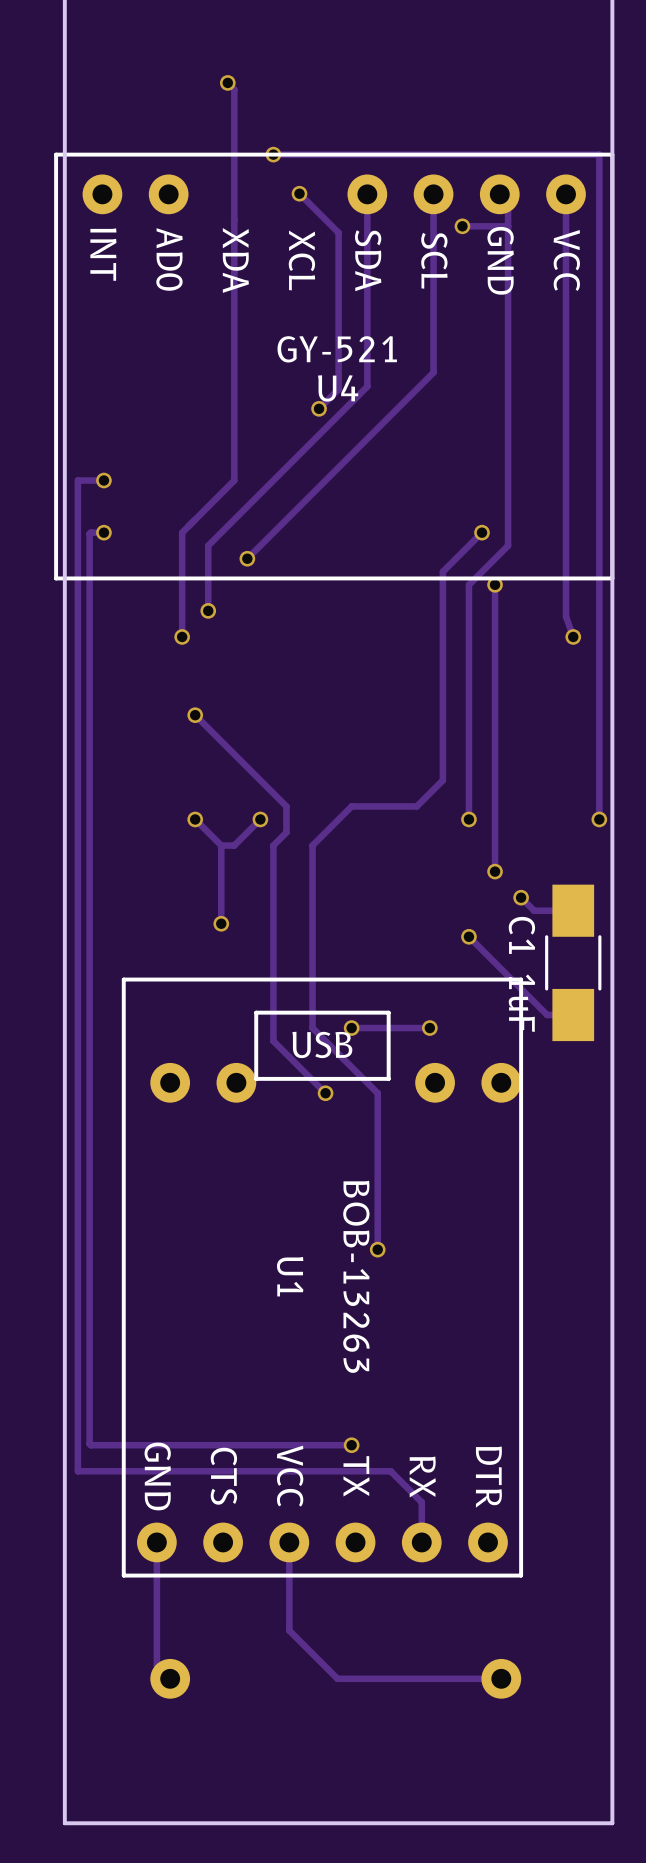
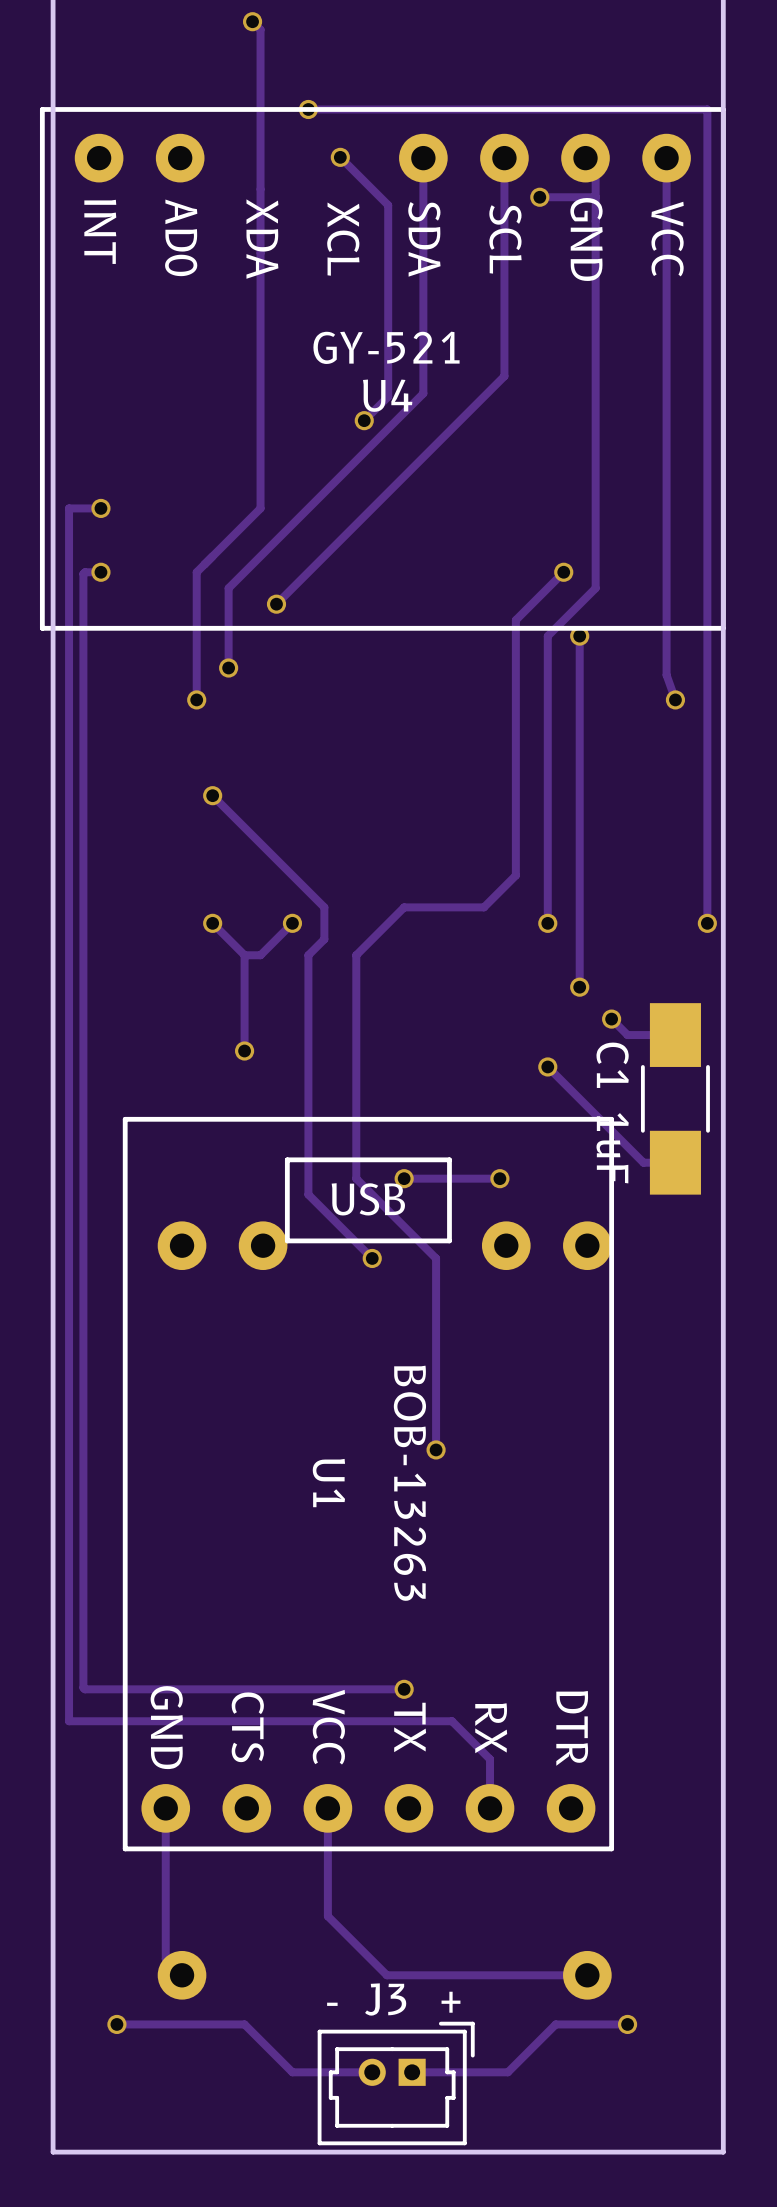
text: none -> + (450, 2002)
text: none -> - (332, 2004)
track: none -> (116, 2024) (244, 2024) (292, 2072) (372, 2072)
via: none -> (116, 2024)
track: none -> (627, 2024) (555, 2024) (507, 2072) (412, 2072)
via: none -> (627, 2024)
J3: none -> (396, 2083)

